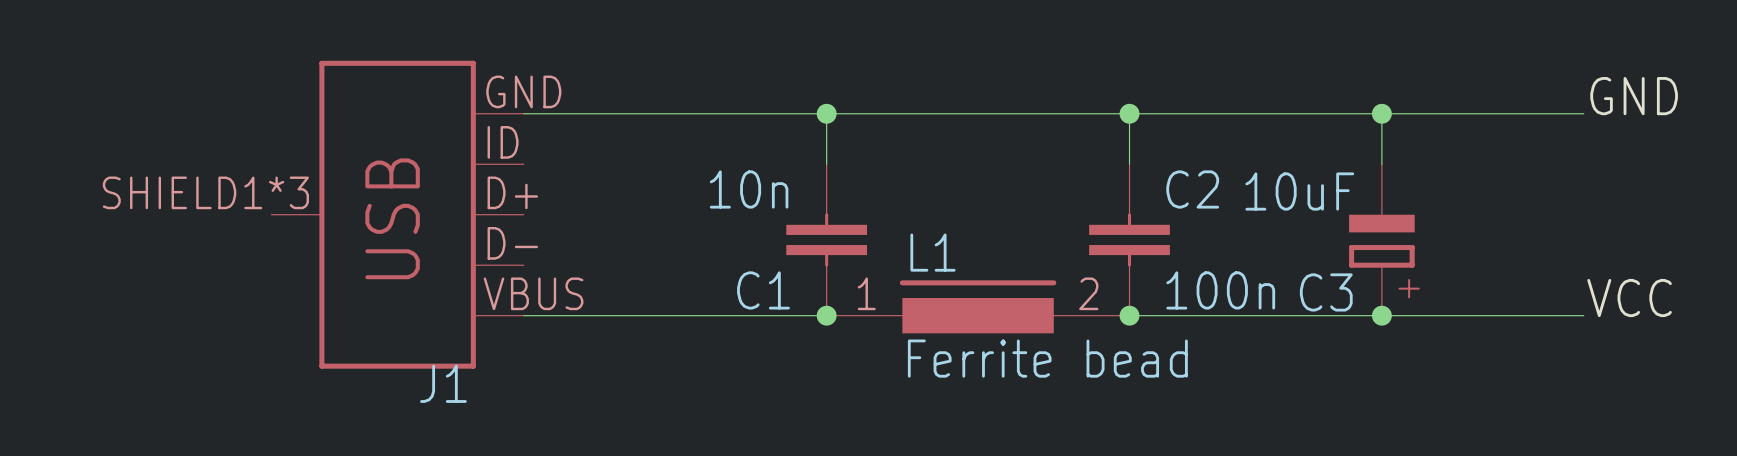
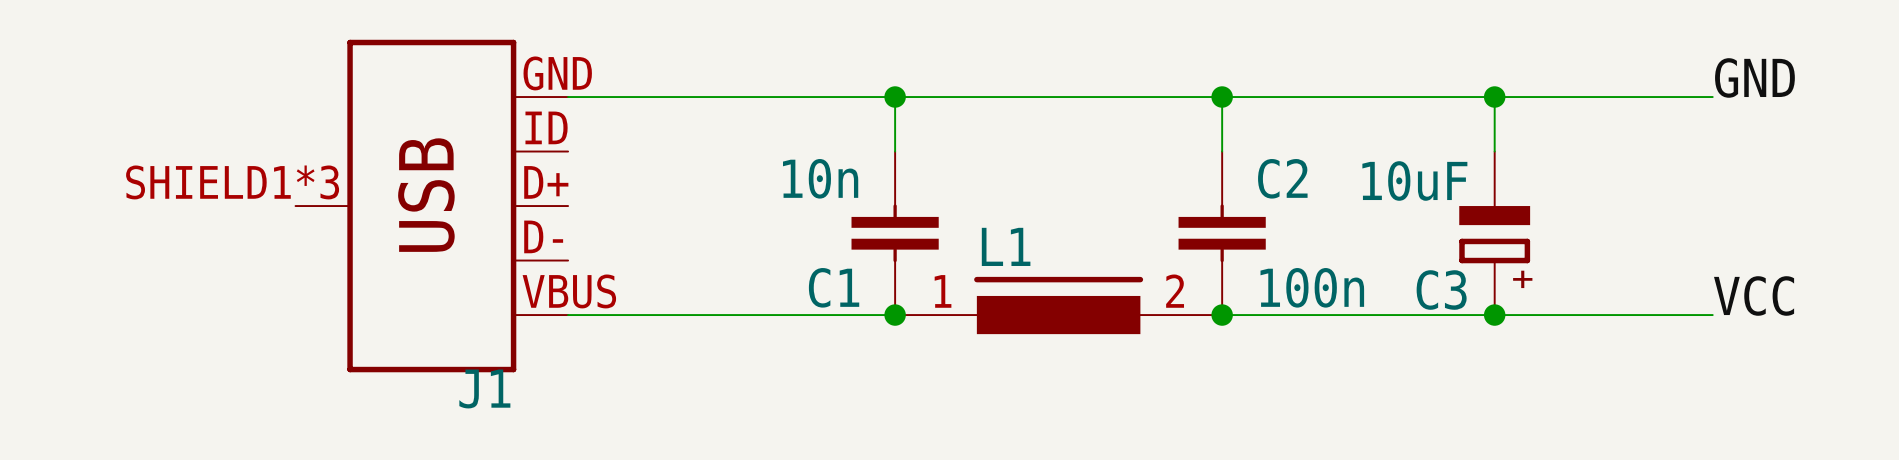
L1 value: Ferrite bead (1047, 358) -> none

